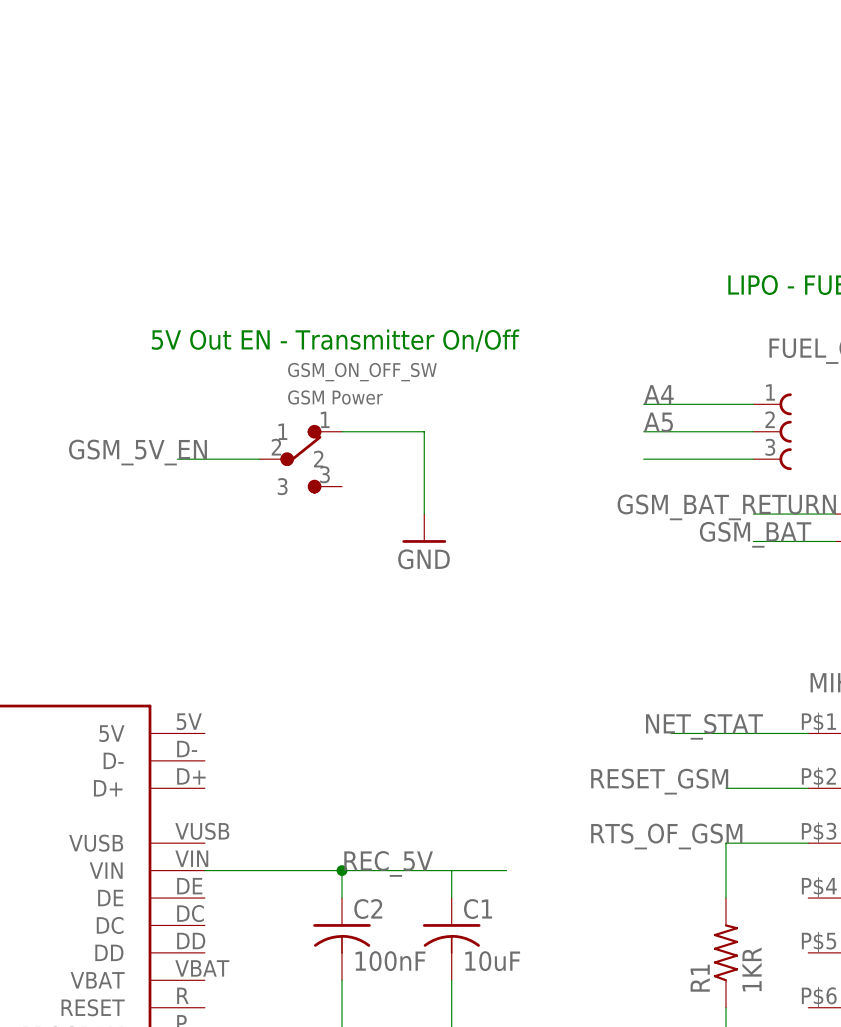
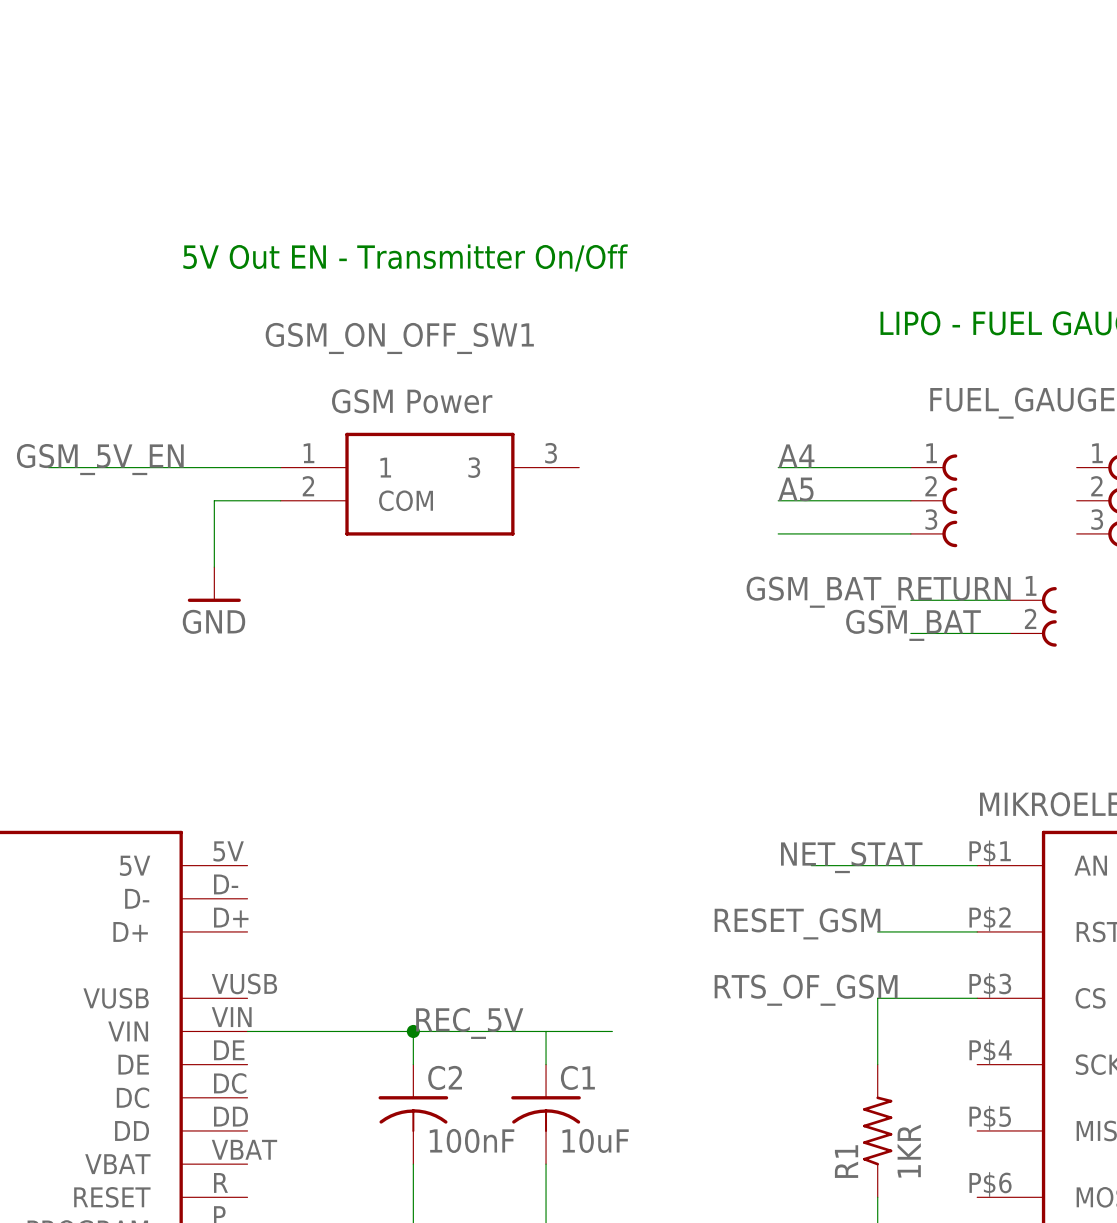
text position: 5V Out EN - Transmitter On/Off (335, 340) -> 5V Out EN - Transmitter On/Off (405, 257)
wire: none -> (48, 467) (280, 467)
GSM_ON_OFF_SW1: none -> GSM Power (429, 484)
wire: none -> (280, 500) (214, 500) (214, 567)
wire: (341, 431) (424, 431) (424, 514) -> none
label position: GSM_5V_EN (137, 452) -> GSM_5V_EN (100, 459)
wire: (177, 459) (259, 459) -> none
GSM_ON_OFF_SW: GSM Power (300, 459) -> none
power symbol position: GND (424, 528) -> GND (214, 584)

